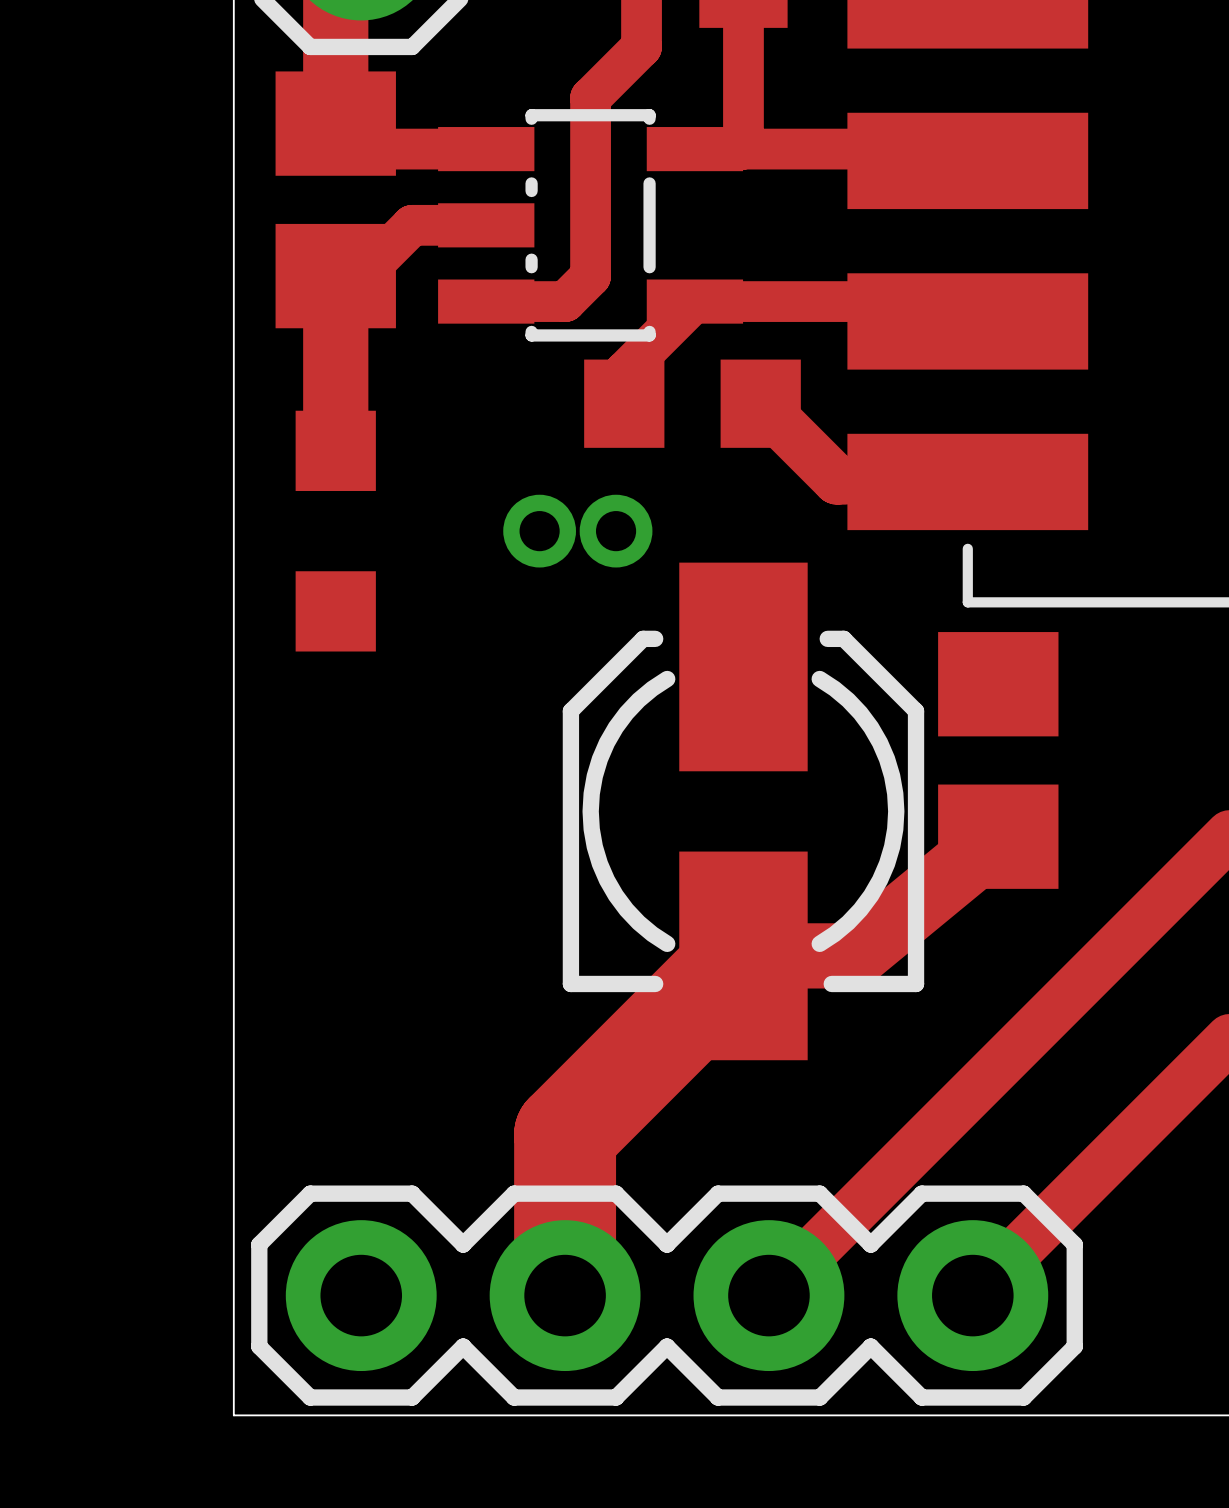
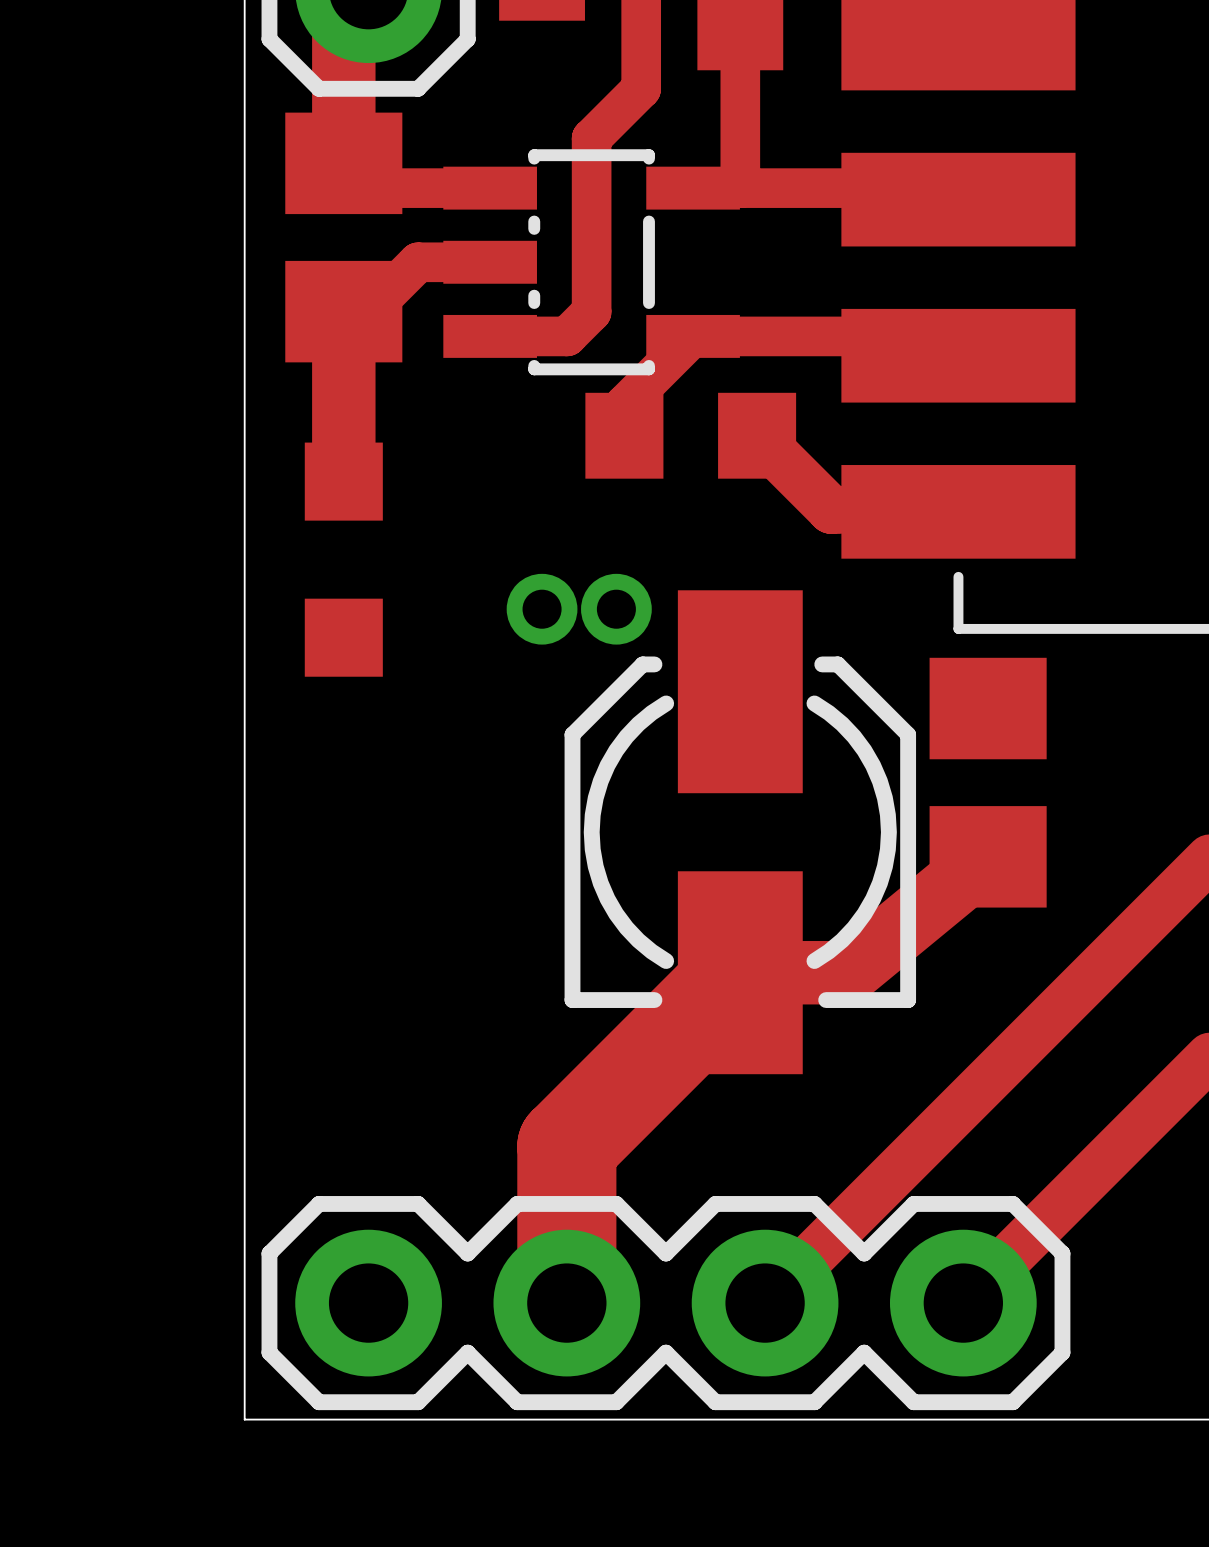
via position: (539, 531) -> (542, 609)
via position: (616, 531) -> (616, 609)

